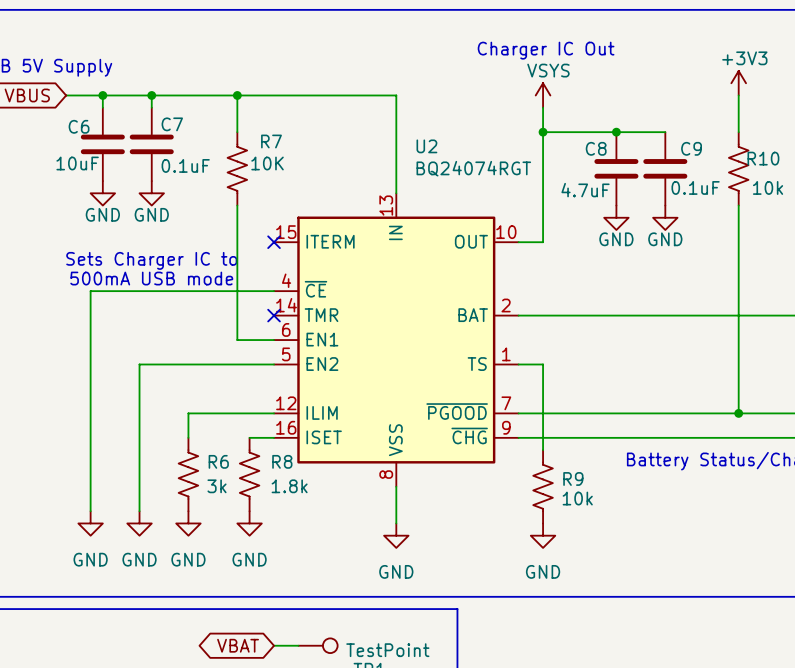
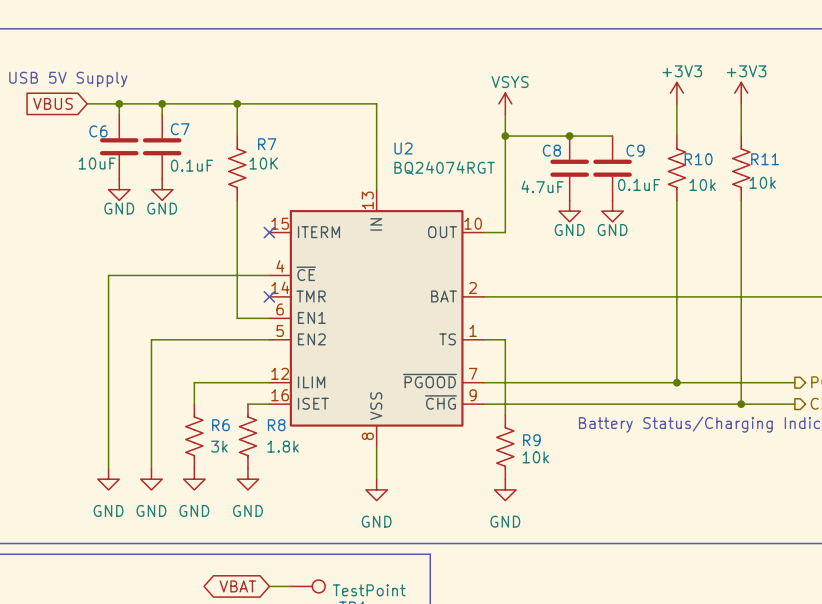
text: Charger IC Out (546, 50) -> none
text: Sets Charger IC to (151, 260) -> none
text: 500mA USB mode (151, 278) -> none

